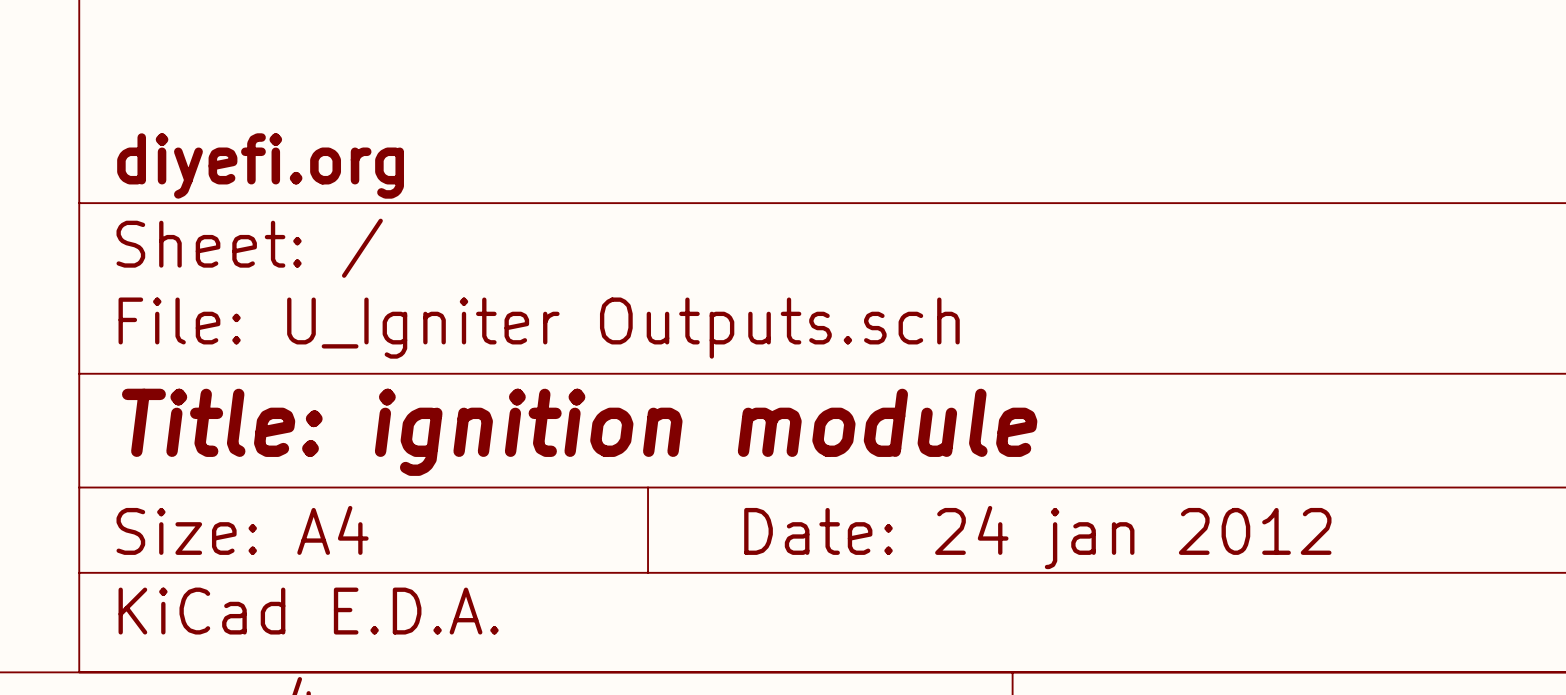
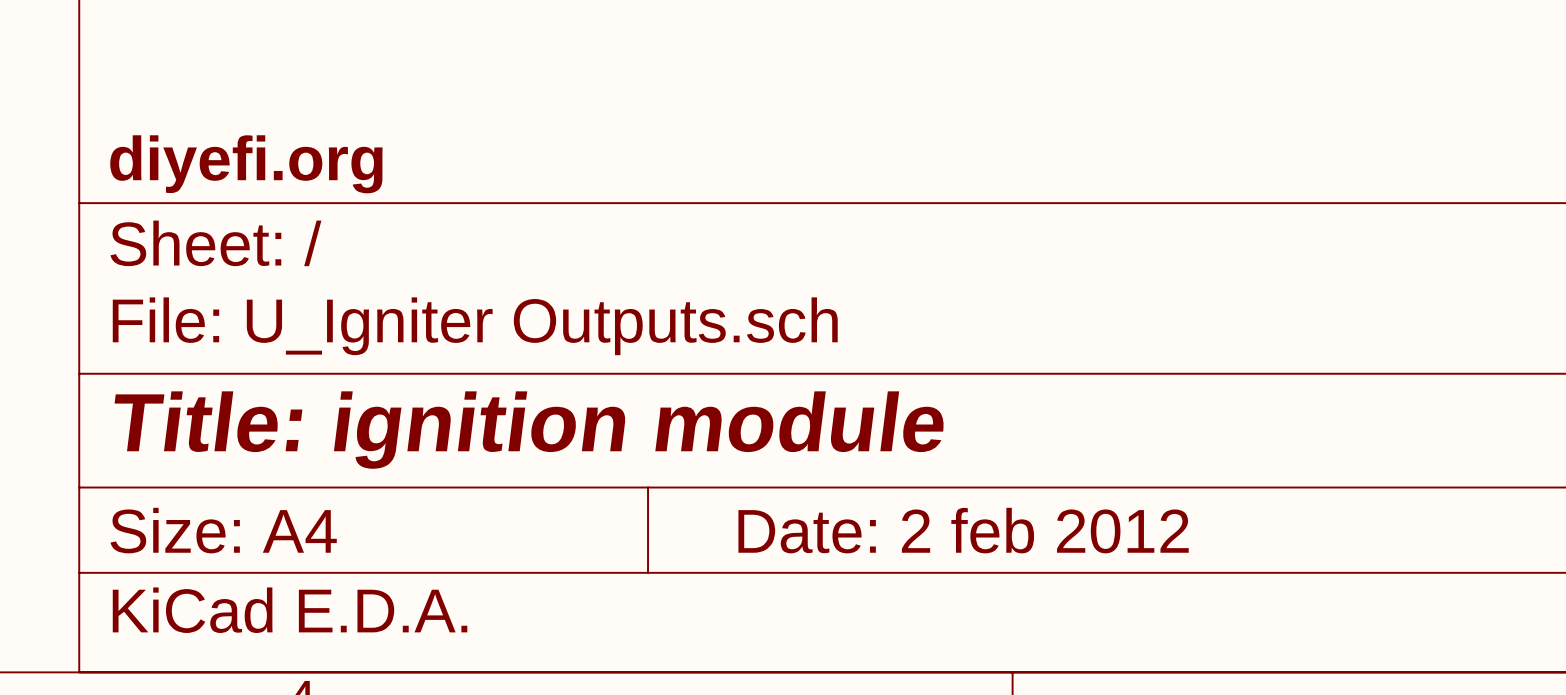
title block: Date: 24 jan 2012 (1037, 537) -> Date: 2 feb 2012 (963, 530)

